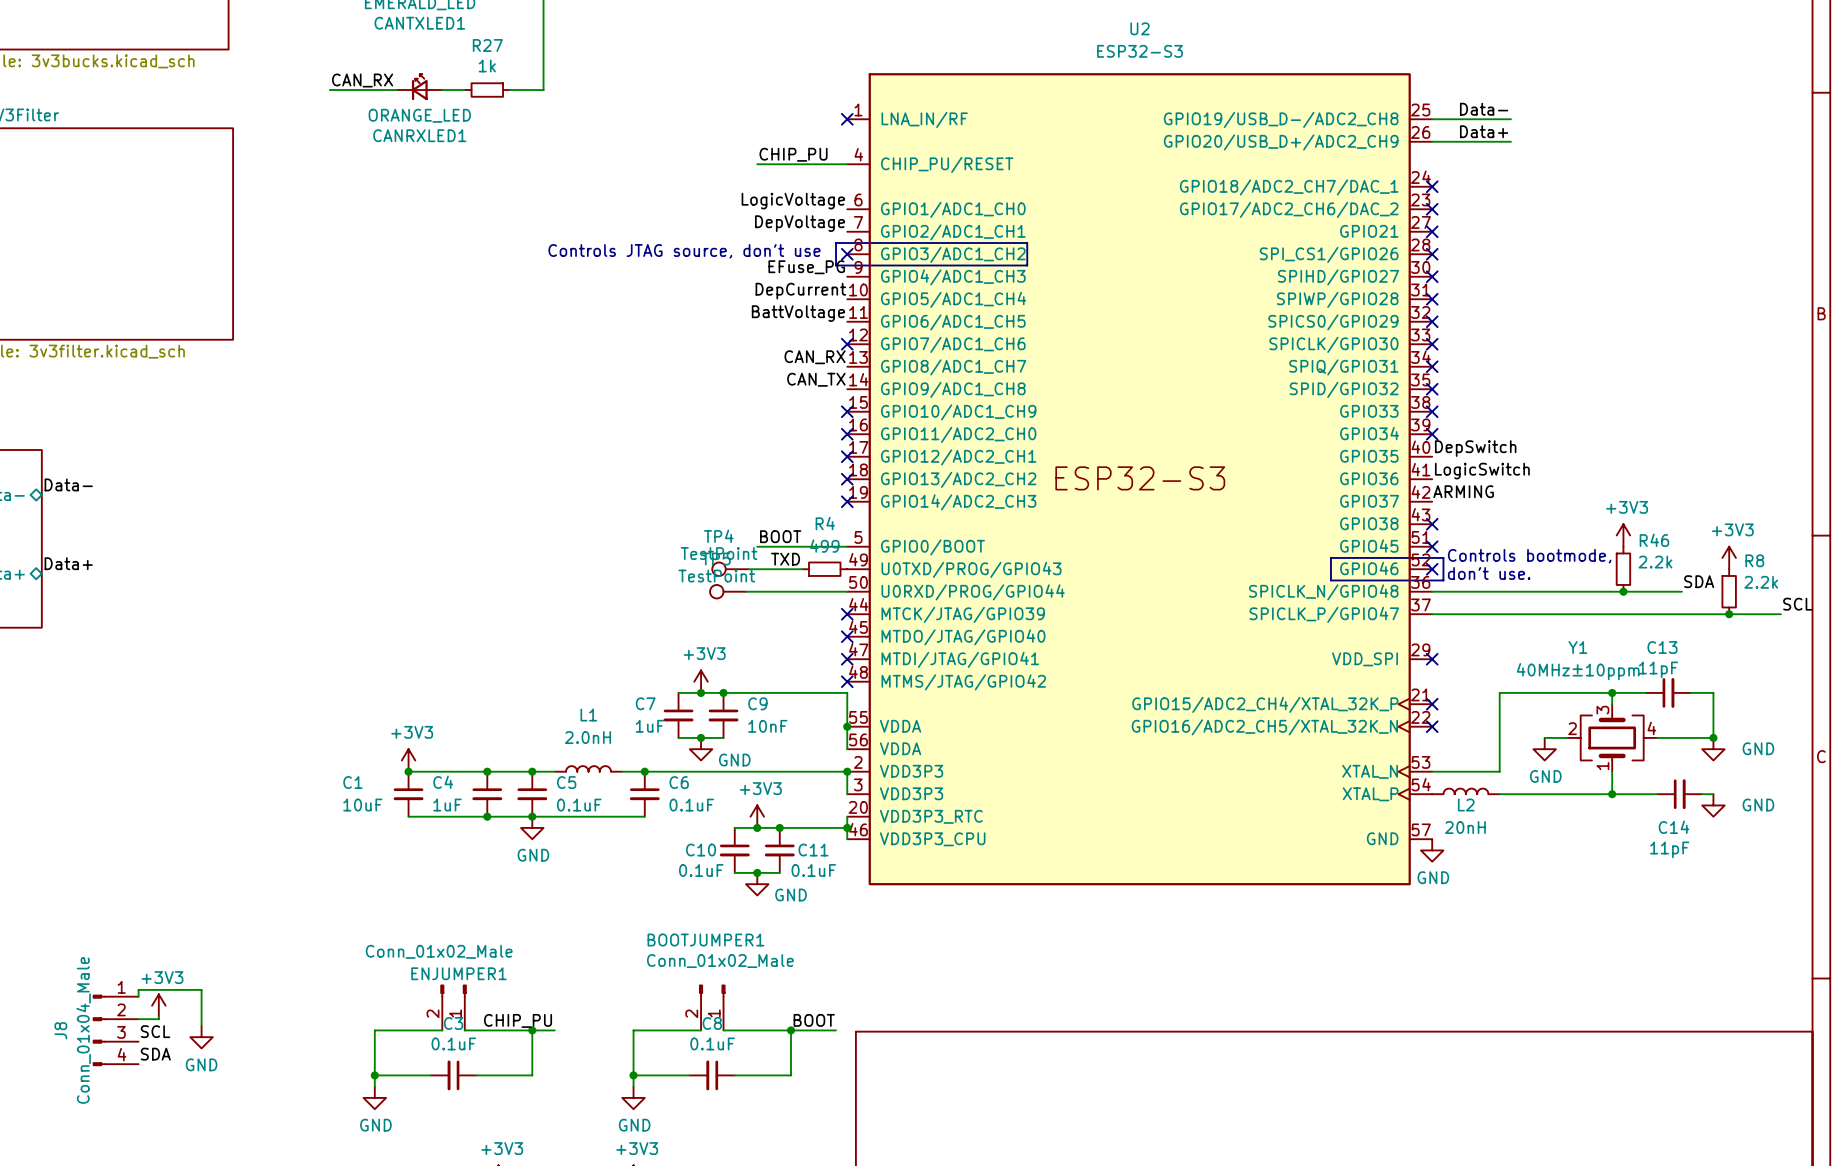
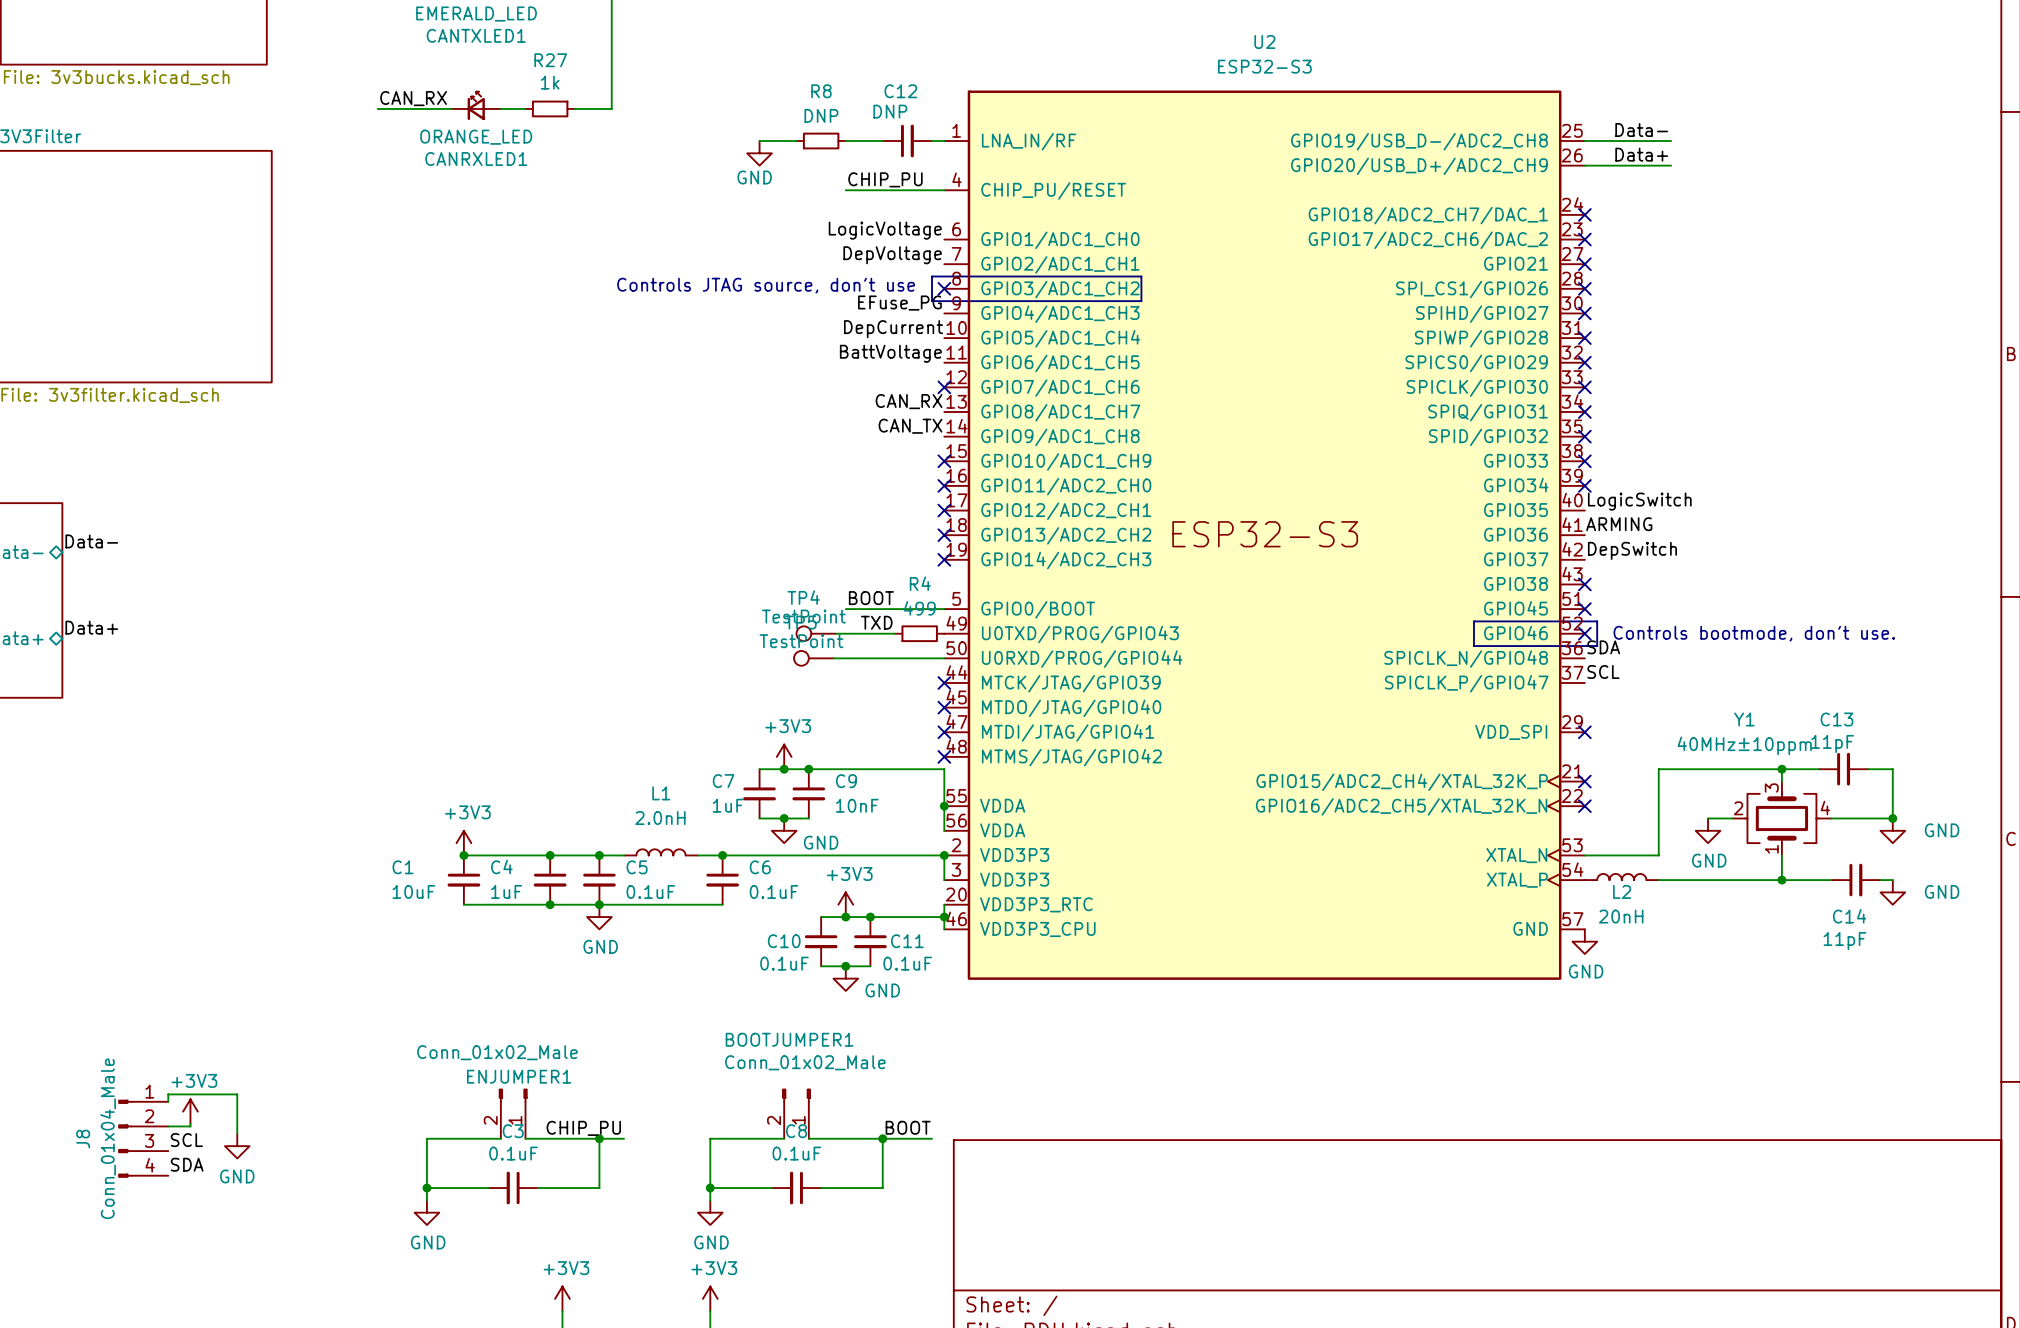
wire: none -> (759, 141) (796, 141)
wire: none -> (845, 141) (882, 141)
C12: none -> DNP (907, 141)
wire: none -> (932, 141) (944, 141)
no-connect mark: (847, 119) -> none
power symbol: none -> GND (759, 153)
label: DepSwitch (1475, 448) -> LogicSwitch (1639, 501)
label: LogicSwitch (1482, 471) -> ARMING (1619, 524)
label: ARMING (1463, 491) -> DepSwitch (1632, 550)
power symbol: +3V3 (1623, 535) -> none
text: Controls bootmode, (1529, 556) -> Controls bootmode, don't use. (1754, 633)
power symbol: +3V3 (1729, 557) -> none
R8 name position: R8 (1754, 560) -> R8 (821, 91)
R46: 2.2k (1623, 569) -> none
text: don't use. (1489, 573) -> none
label: none -> SDA (1603, 647)
label: SDA (1699, 581) -> none
R8 value: 2.2k (1761, 582) -> DNP (821, 115)
wire: (1432, 591) (1681, 591) -> none
junction: (1623, 591) -> none
R8 rotation: 0° (1729, 591) -> 90° clockwise (821, 141)
R8 position: (1729, 591) -> (821, 141)
label: none -> SCL (1603, 672)
label: SCL (1797, 604) -> none
wire: (1432, 614) (1780, 614) -> none
junction: (1729, 614) -> none

